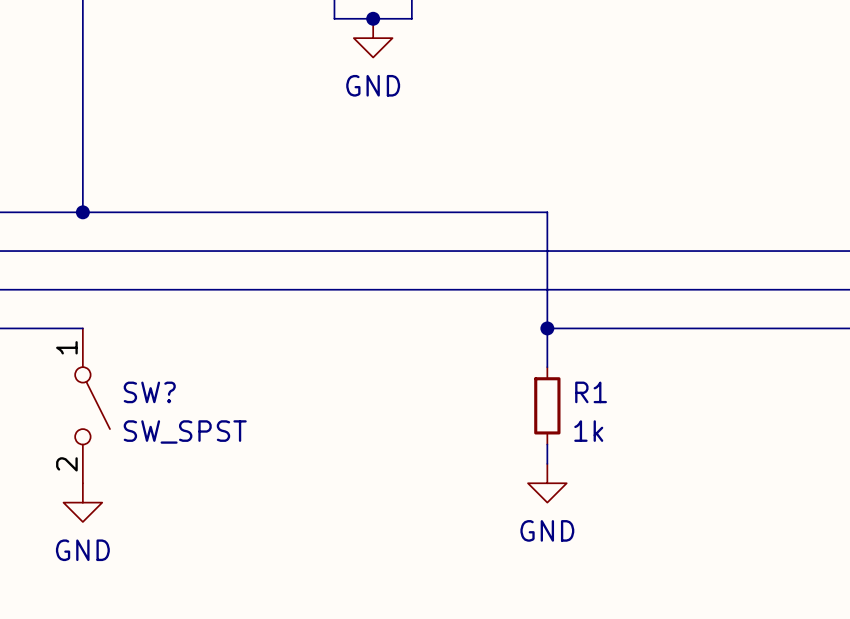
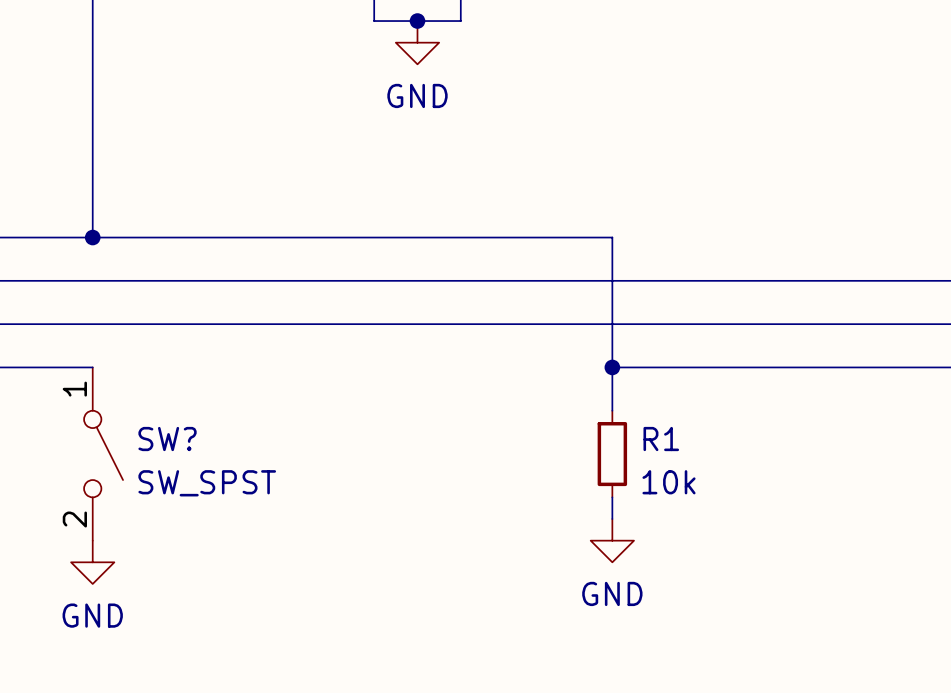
R1 value: 1k (588, 431) -> 10k (669, 482)

